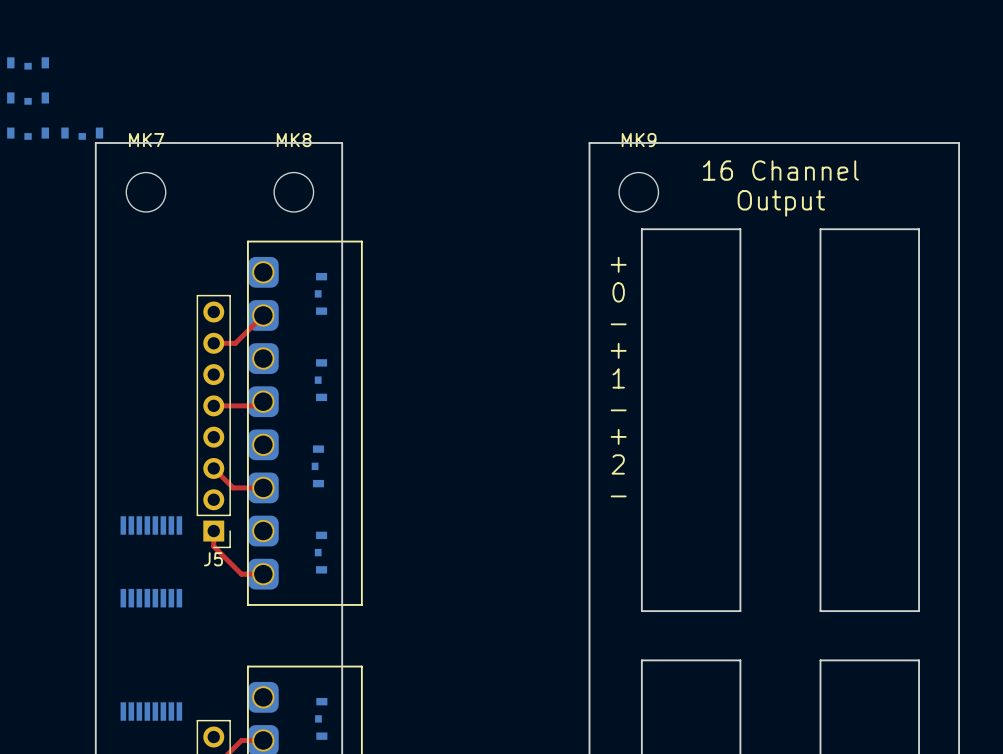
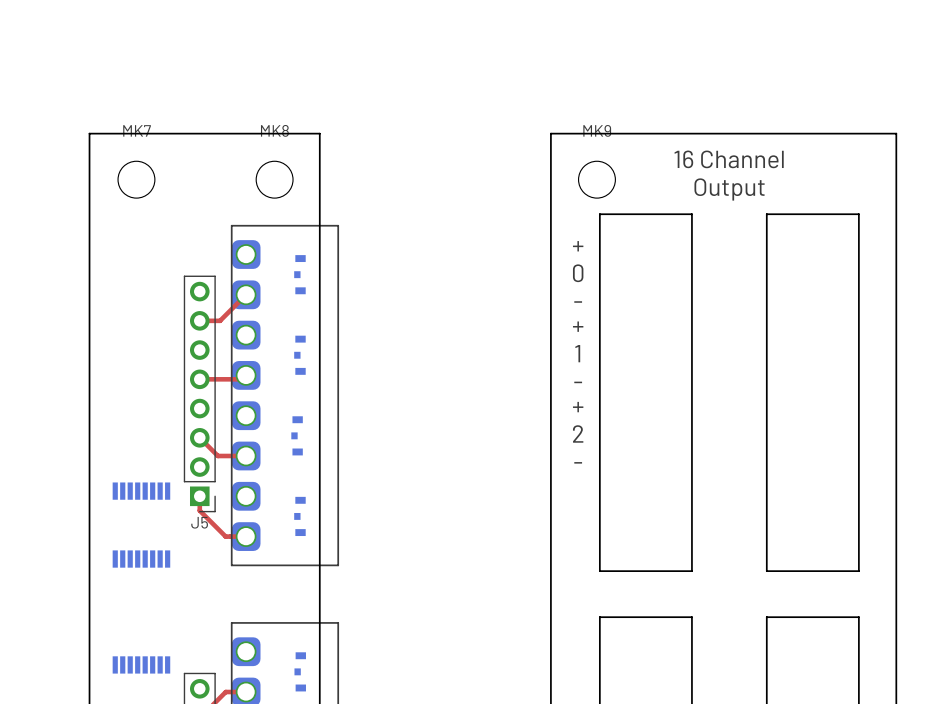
part: (28, 63) -> none
part: (28, 98) -> none
part: (28, 133) -> none
part: (82, 133) -> none

